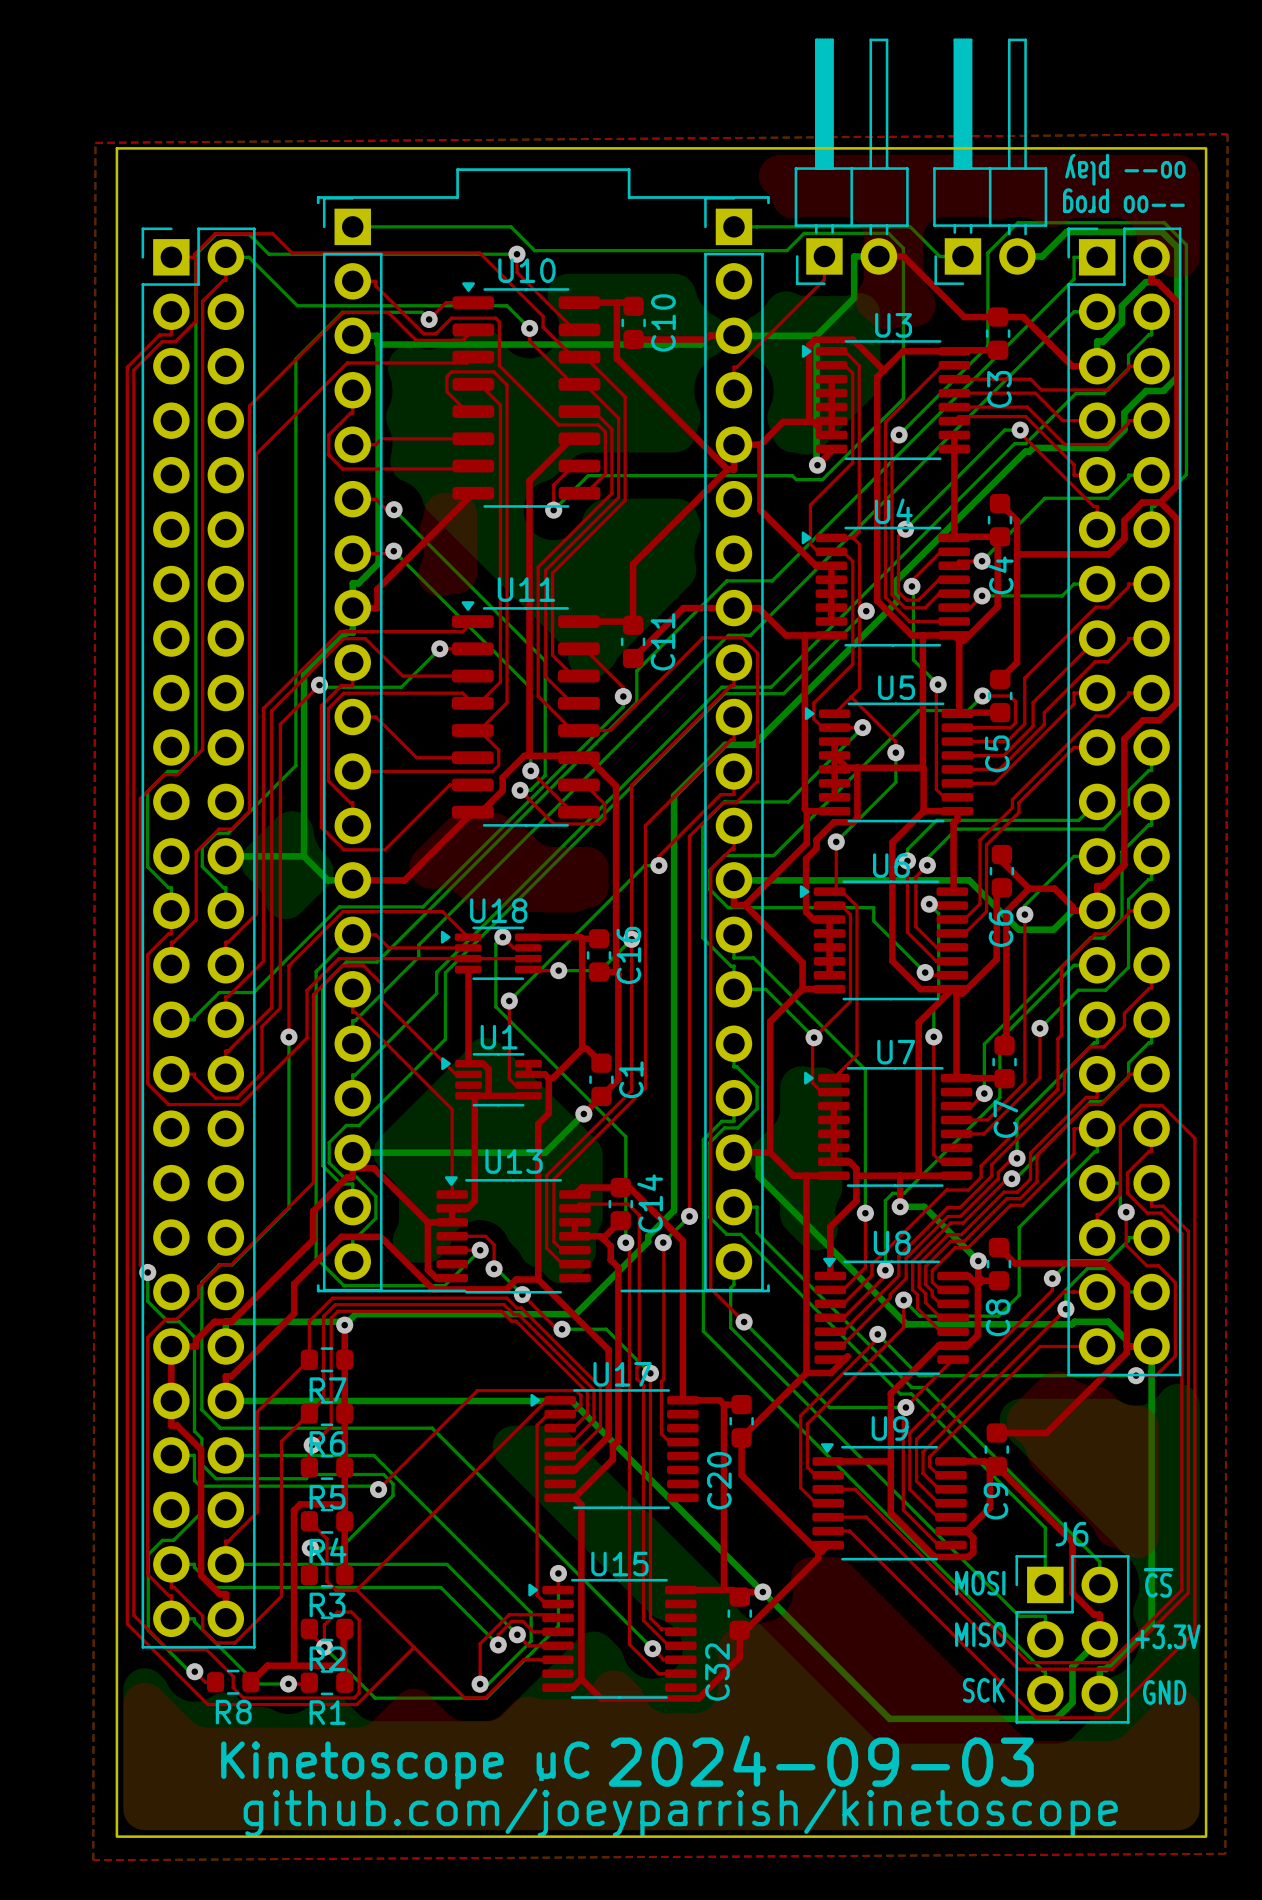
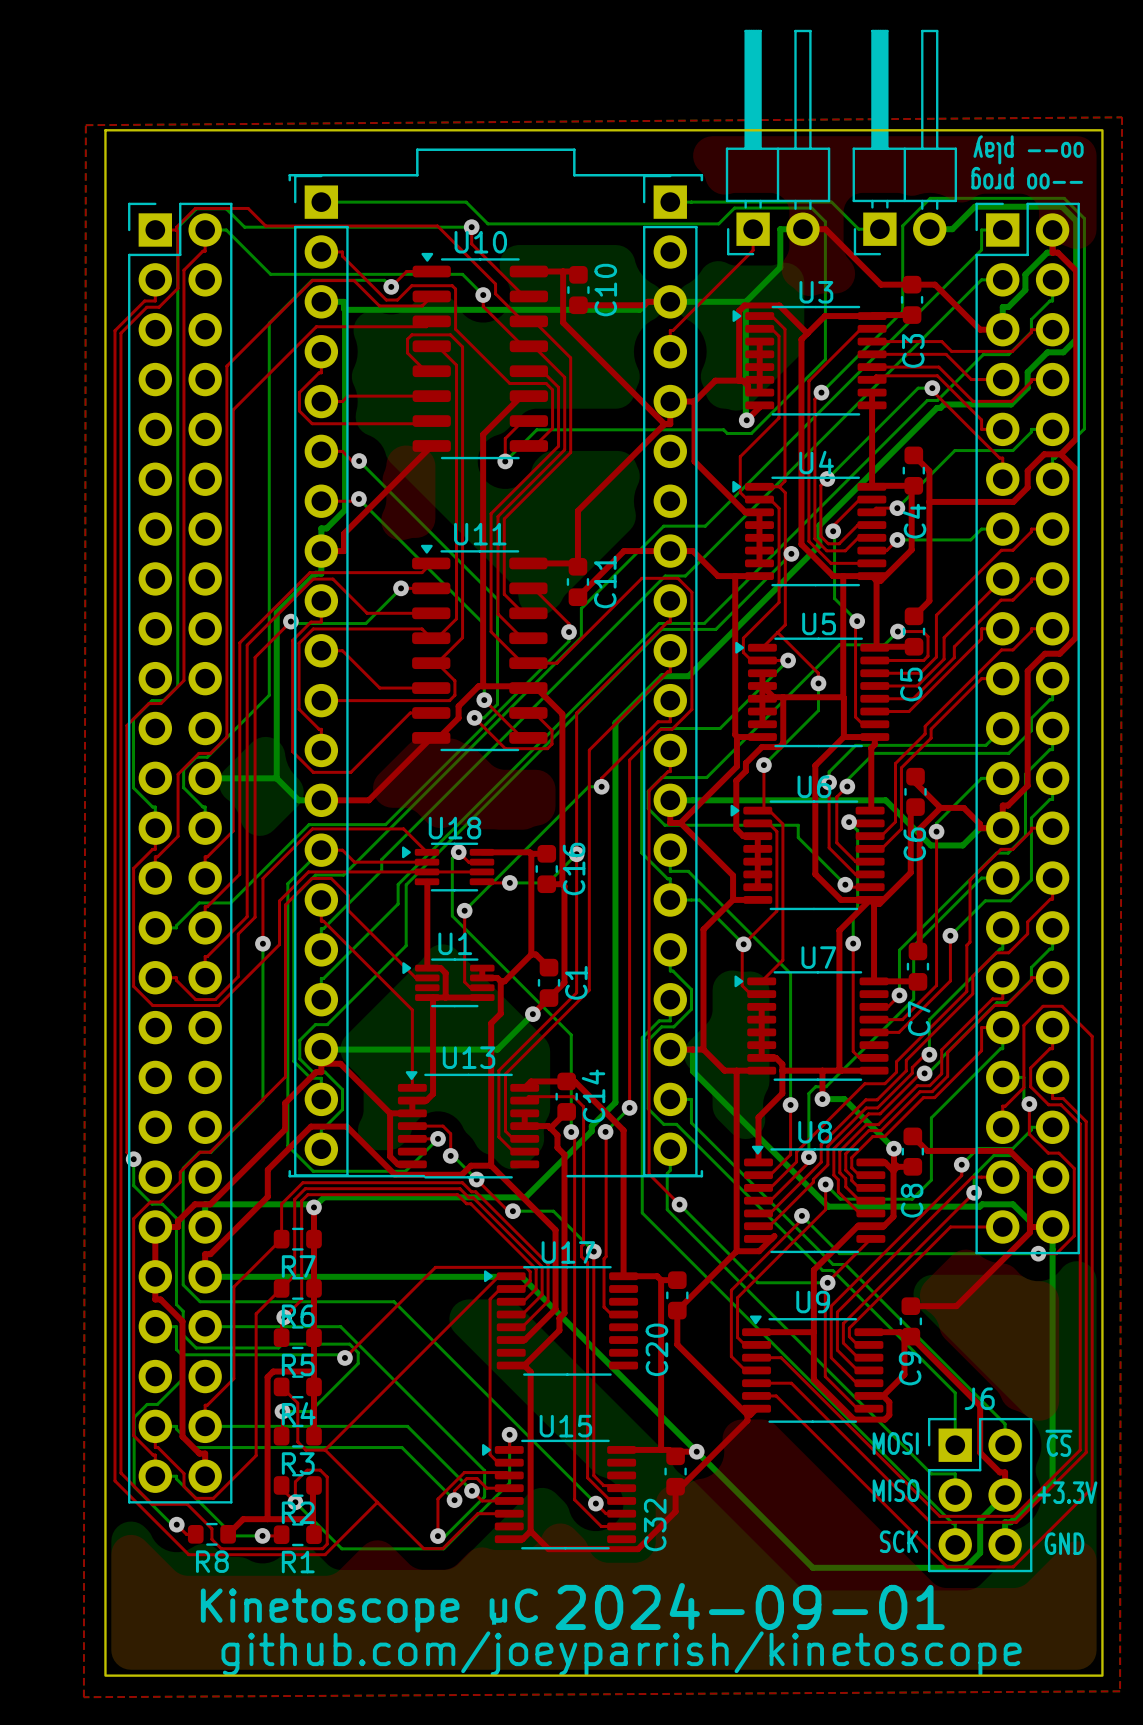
text: 2024-09-03 (821, 1761) -> 2024-09-01 (750, 1606)

